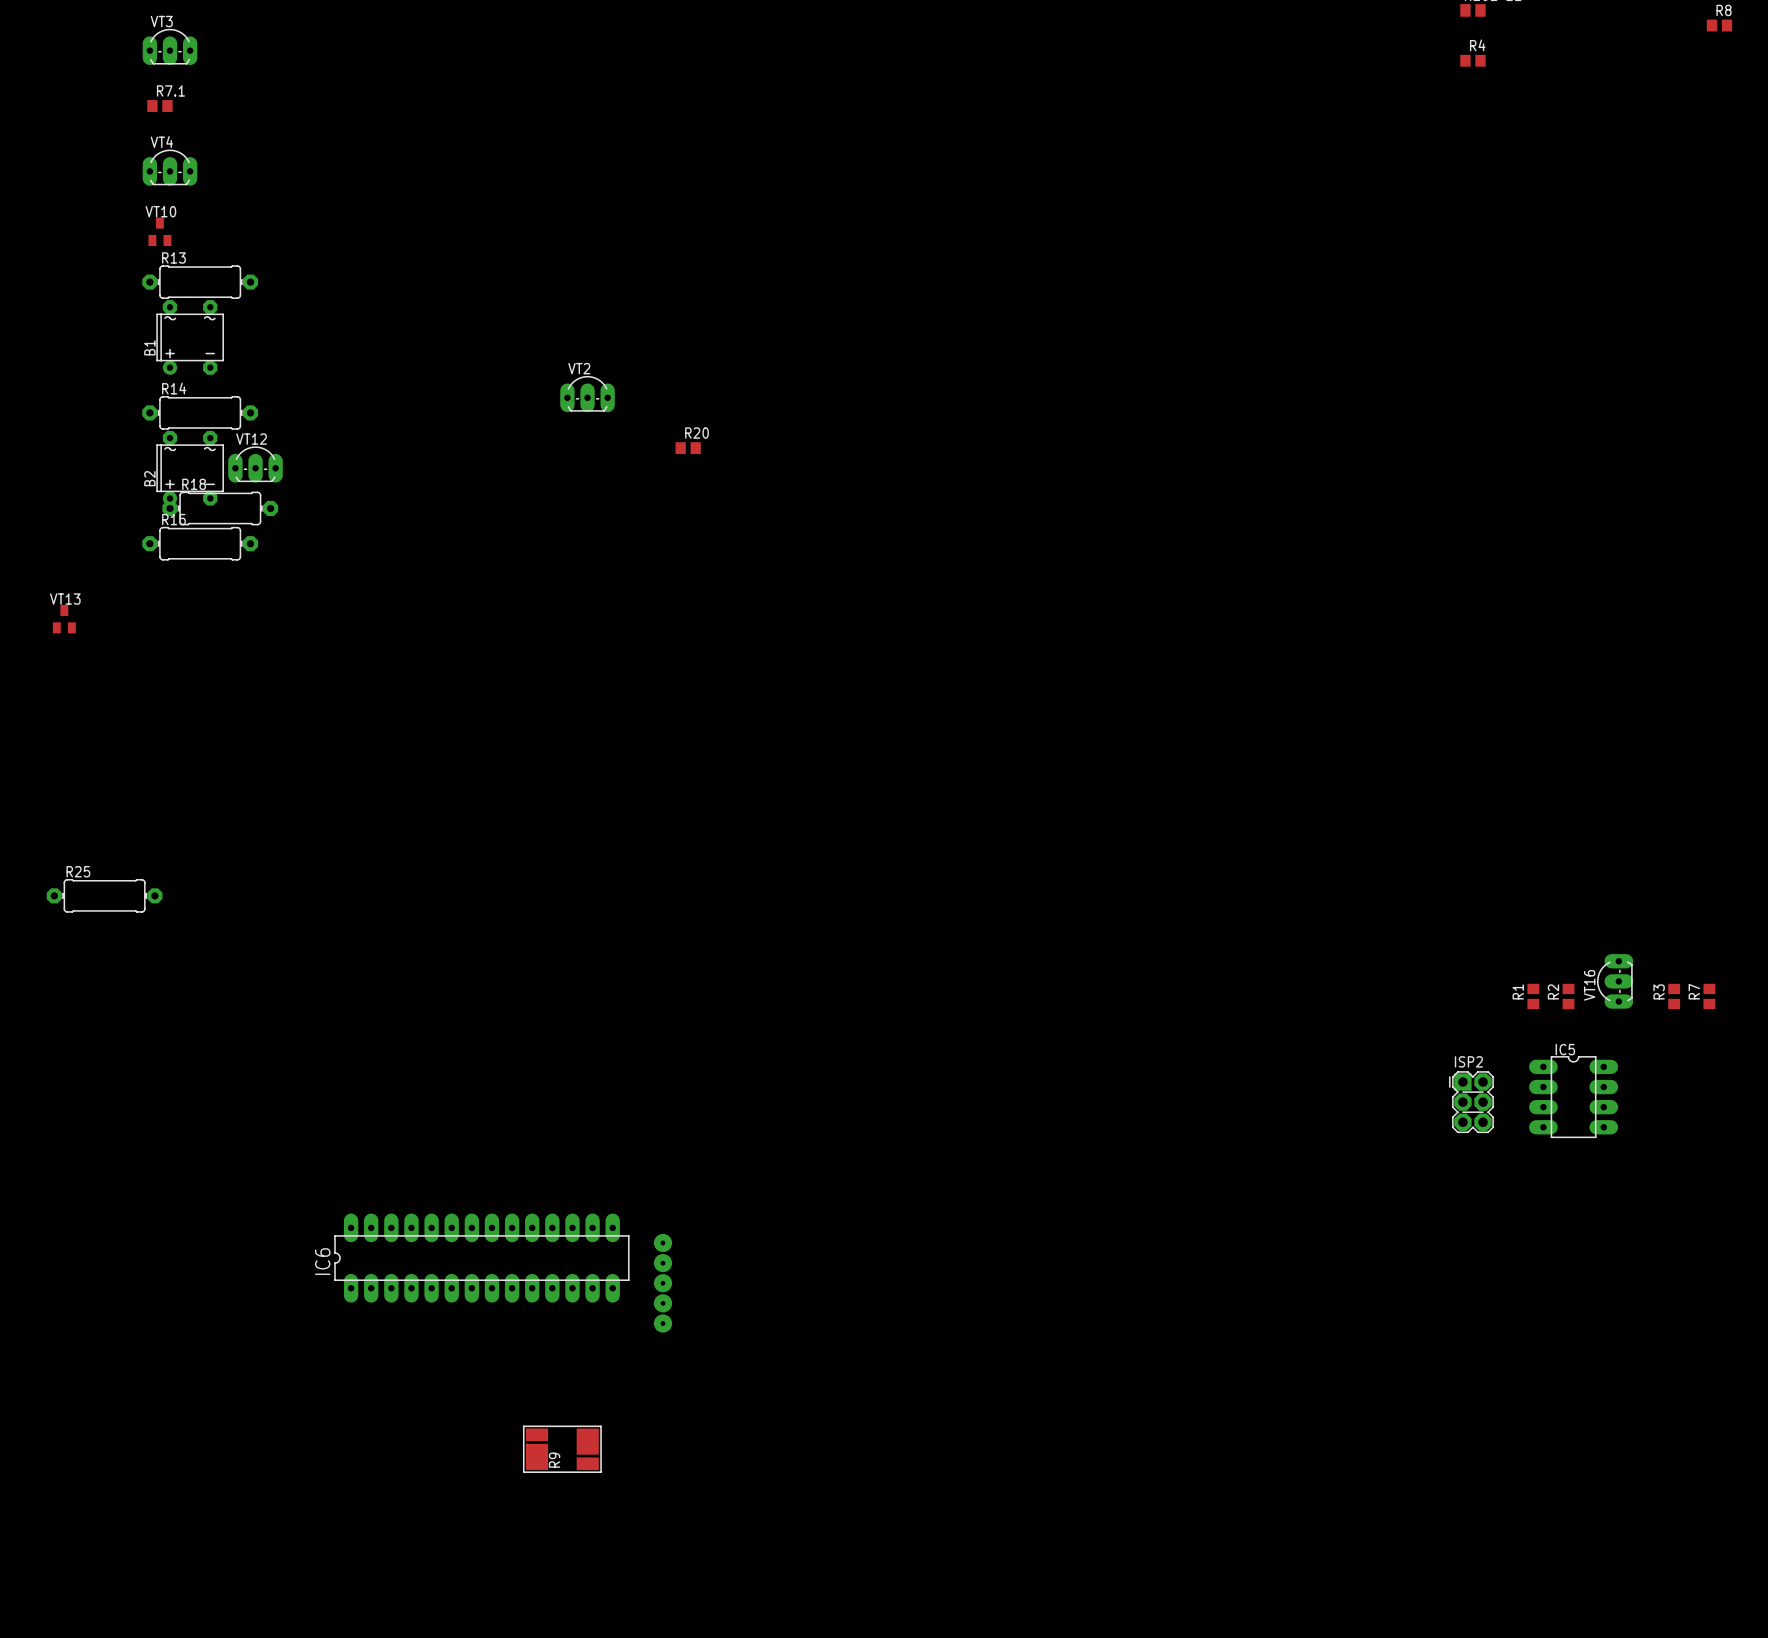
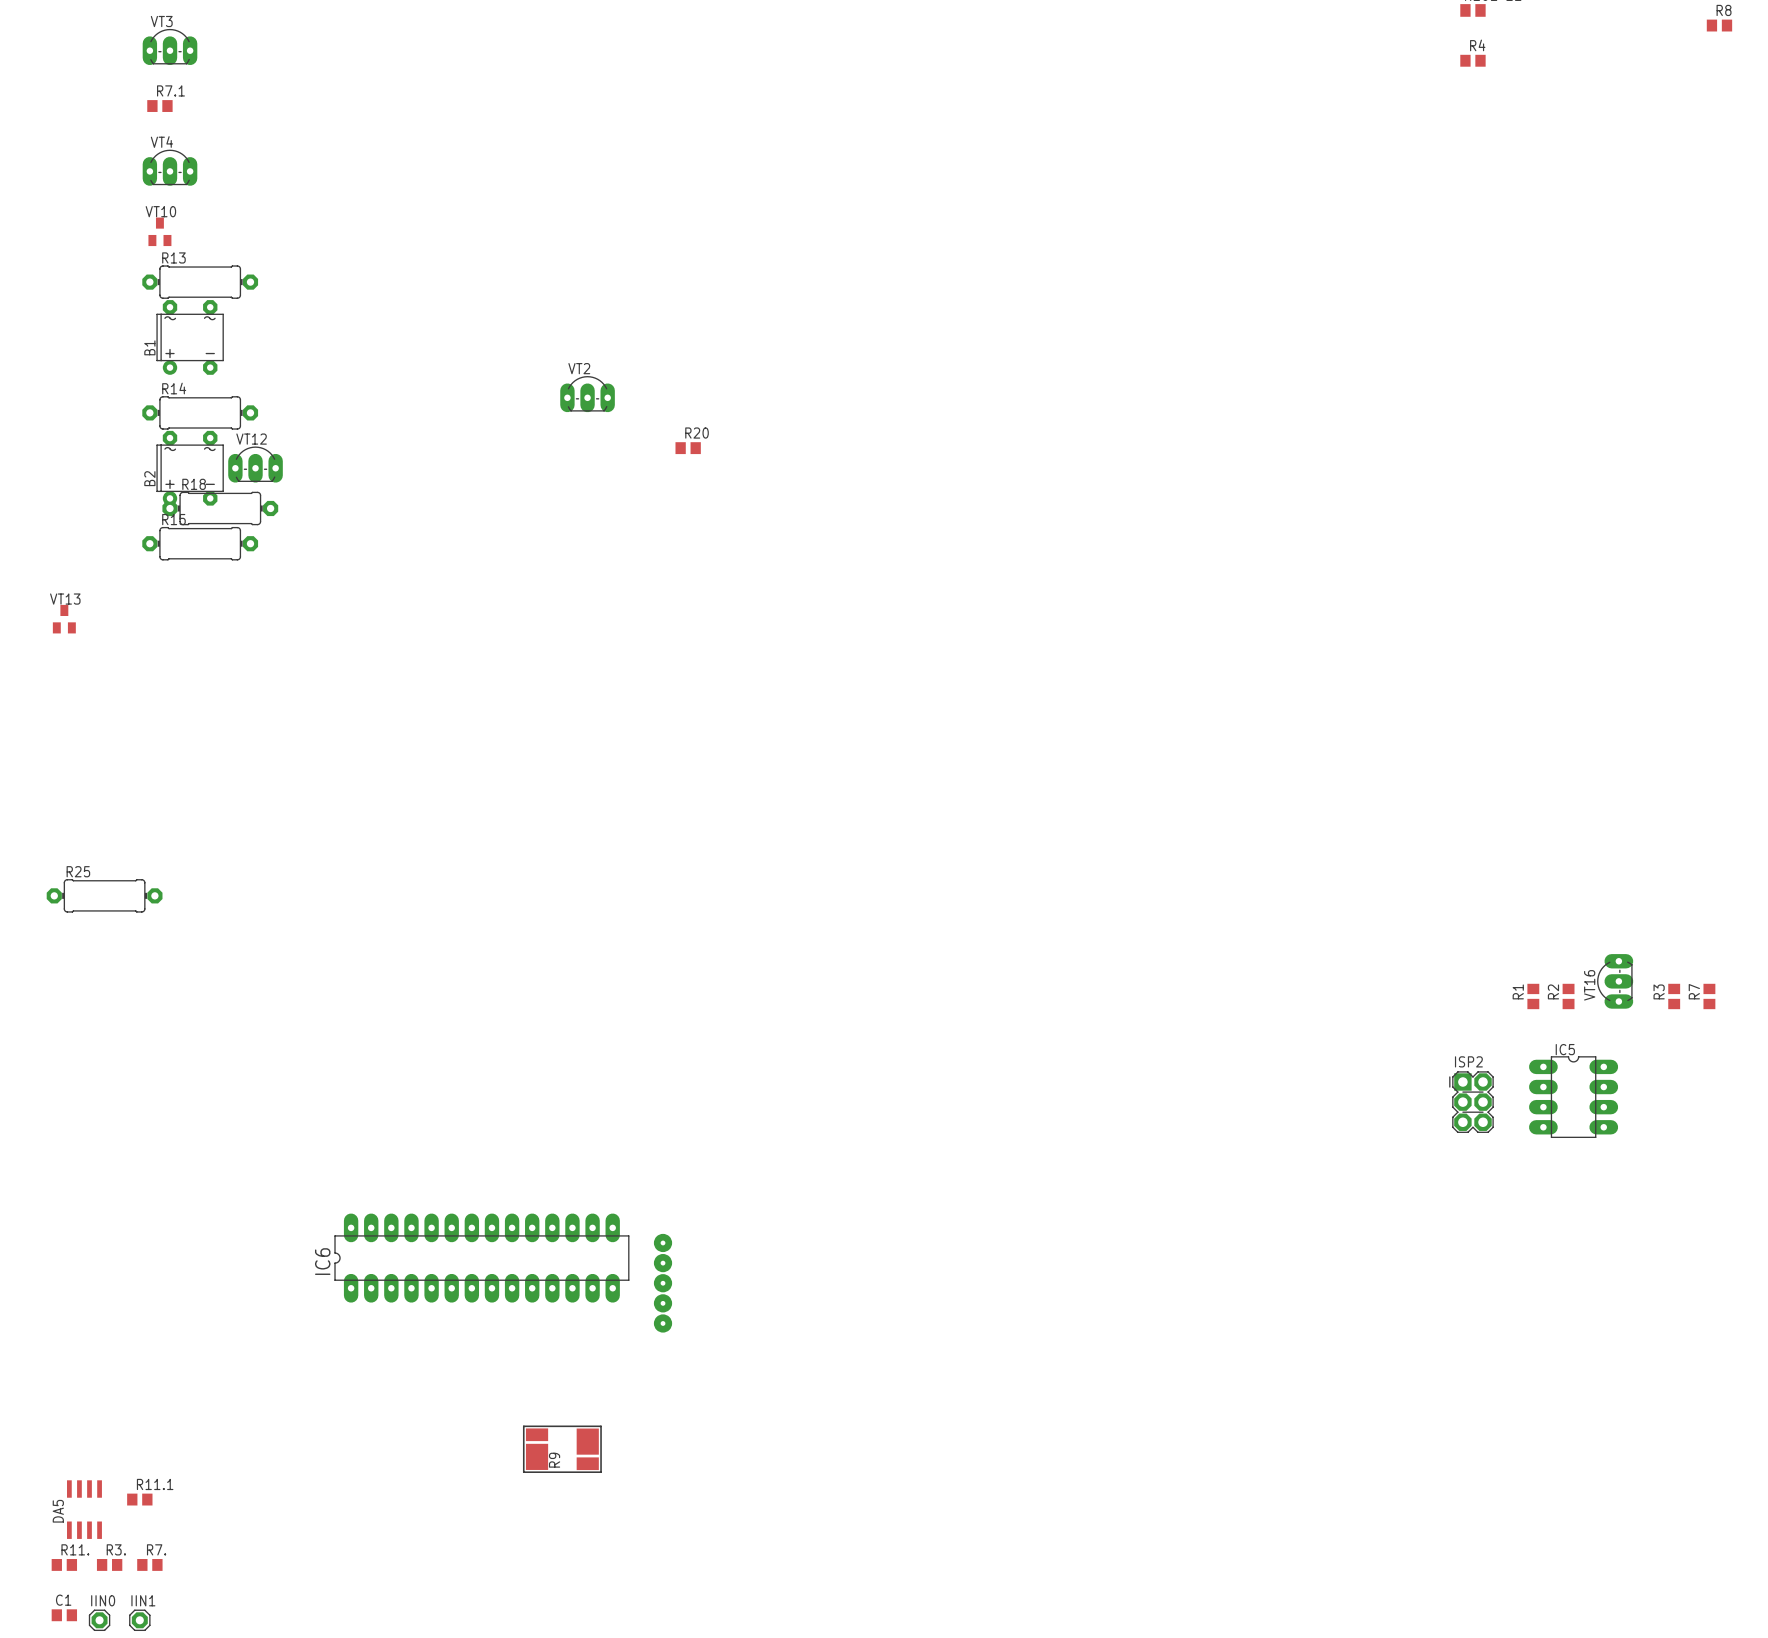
R11.1: none -> (139, 1499)
DA5: none -> (84, 1509)
R11.: none -> (64, 1564)
R3.: none -> (109, 1564)
R7.: none -> (149, 1564)
C1: none -> (64, 1615)
IIN0: none -> (99, 1620)
IIN1: none -> (139, 1620)

